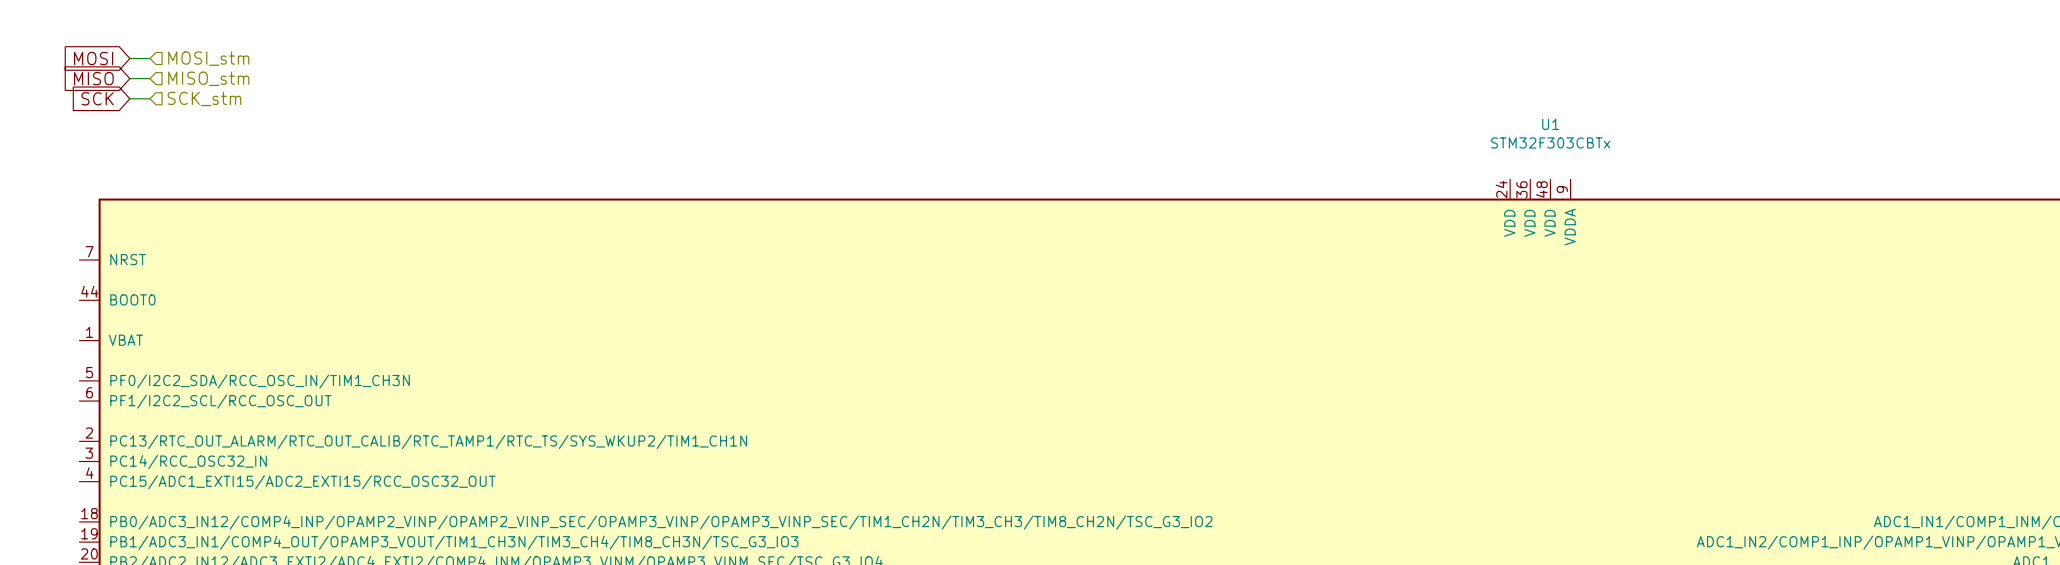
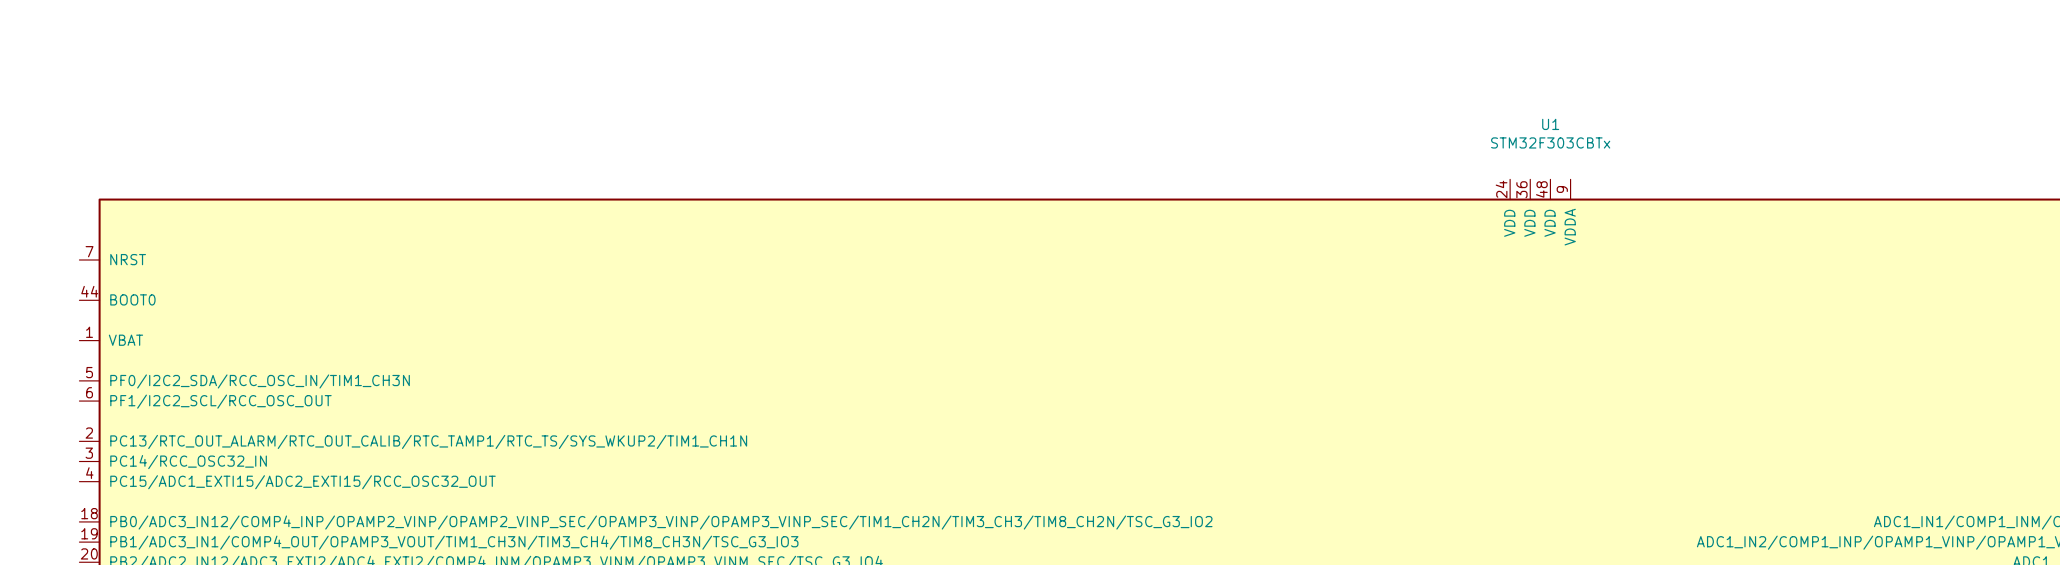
global label: MOSI (93, 58) -> none
wire: (129, 58) (149, 58) -> none
hierarchical label: MOSI_stm (208, 58) -> none
global label: MISO (93, 78) -> none
wire: (129, 78) (149, 78) -> none
hierarchical label: MISO_stm (208, 78) -> none
global label: SCK (97, 98) -> none
wire: (129, 98) (149, 98) -> none
hierarchical label: SCK_stm (204, 98) -> none

